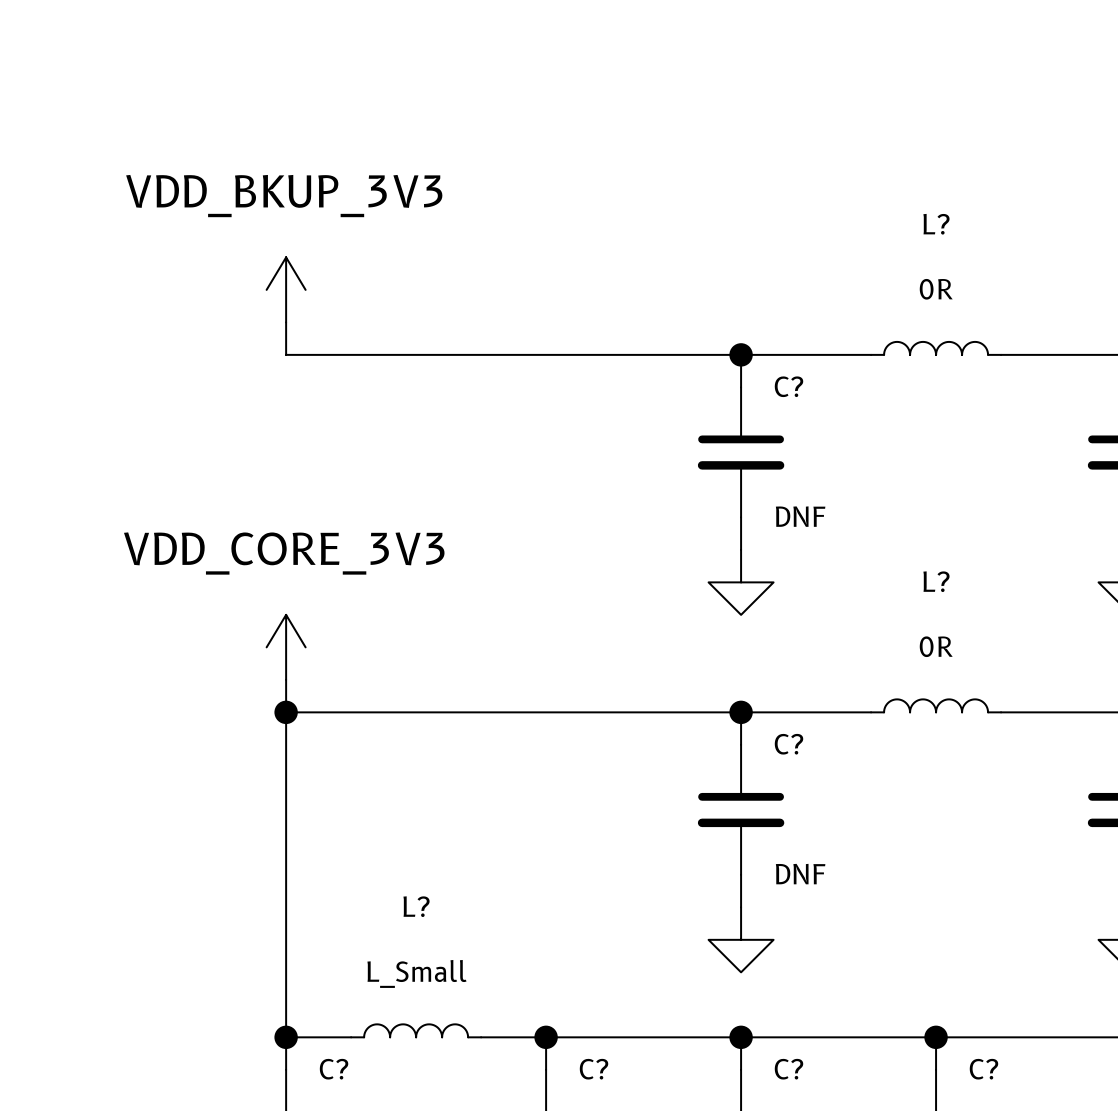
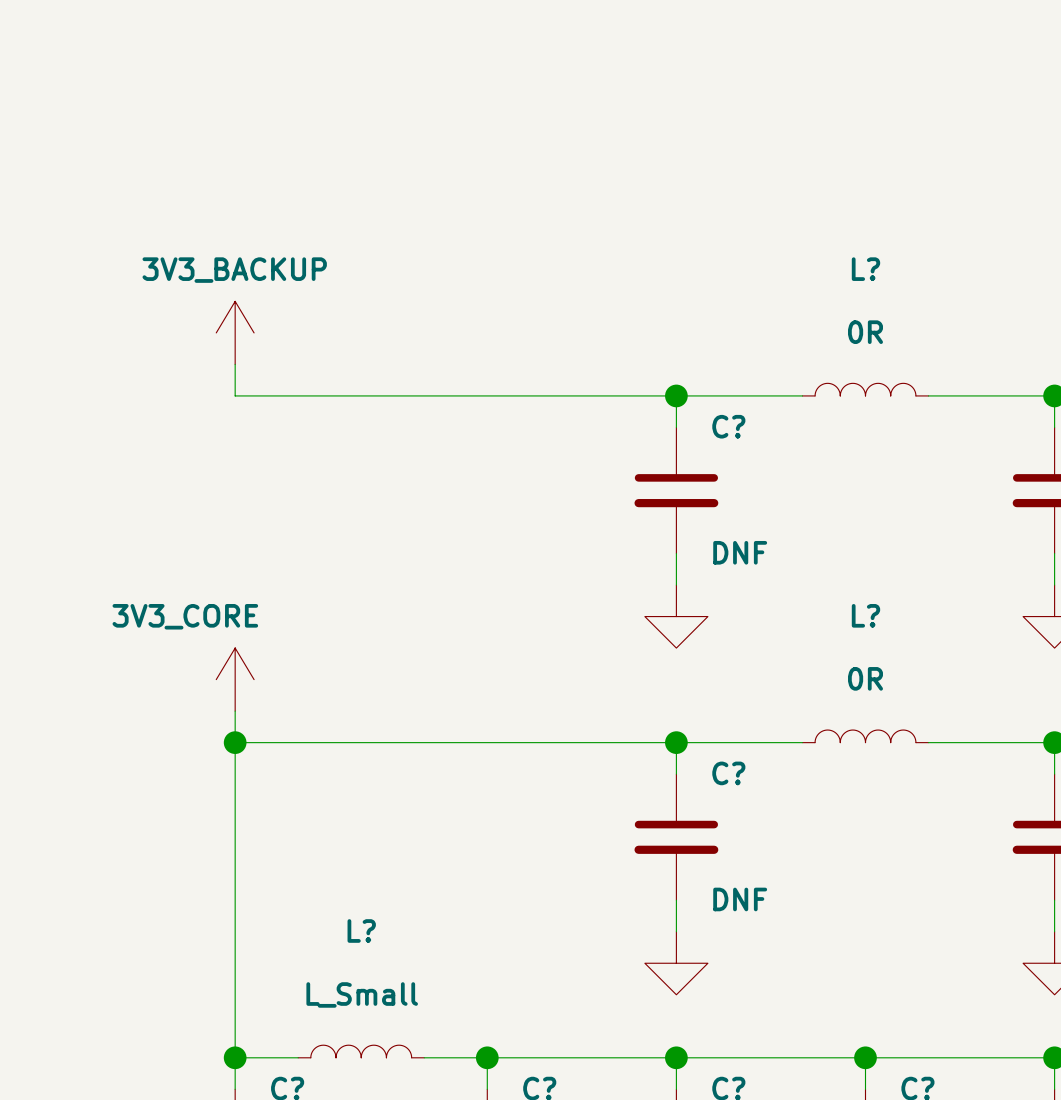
power symbol: VDD_BKUP_3V3 (286, 289) -> 3V3_BACKUP (235, 332)
power symbol: VDD_CORE_3V3 (286, 647) -> 3V3_CORE (235, 679)

